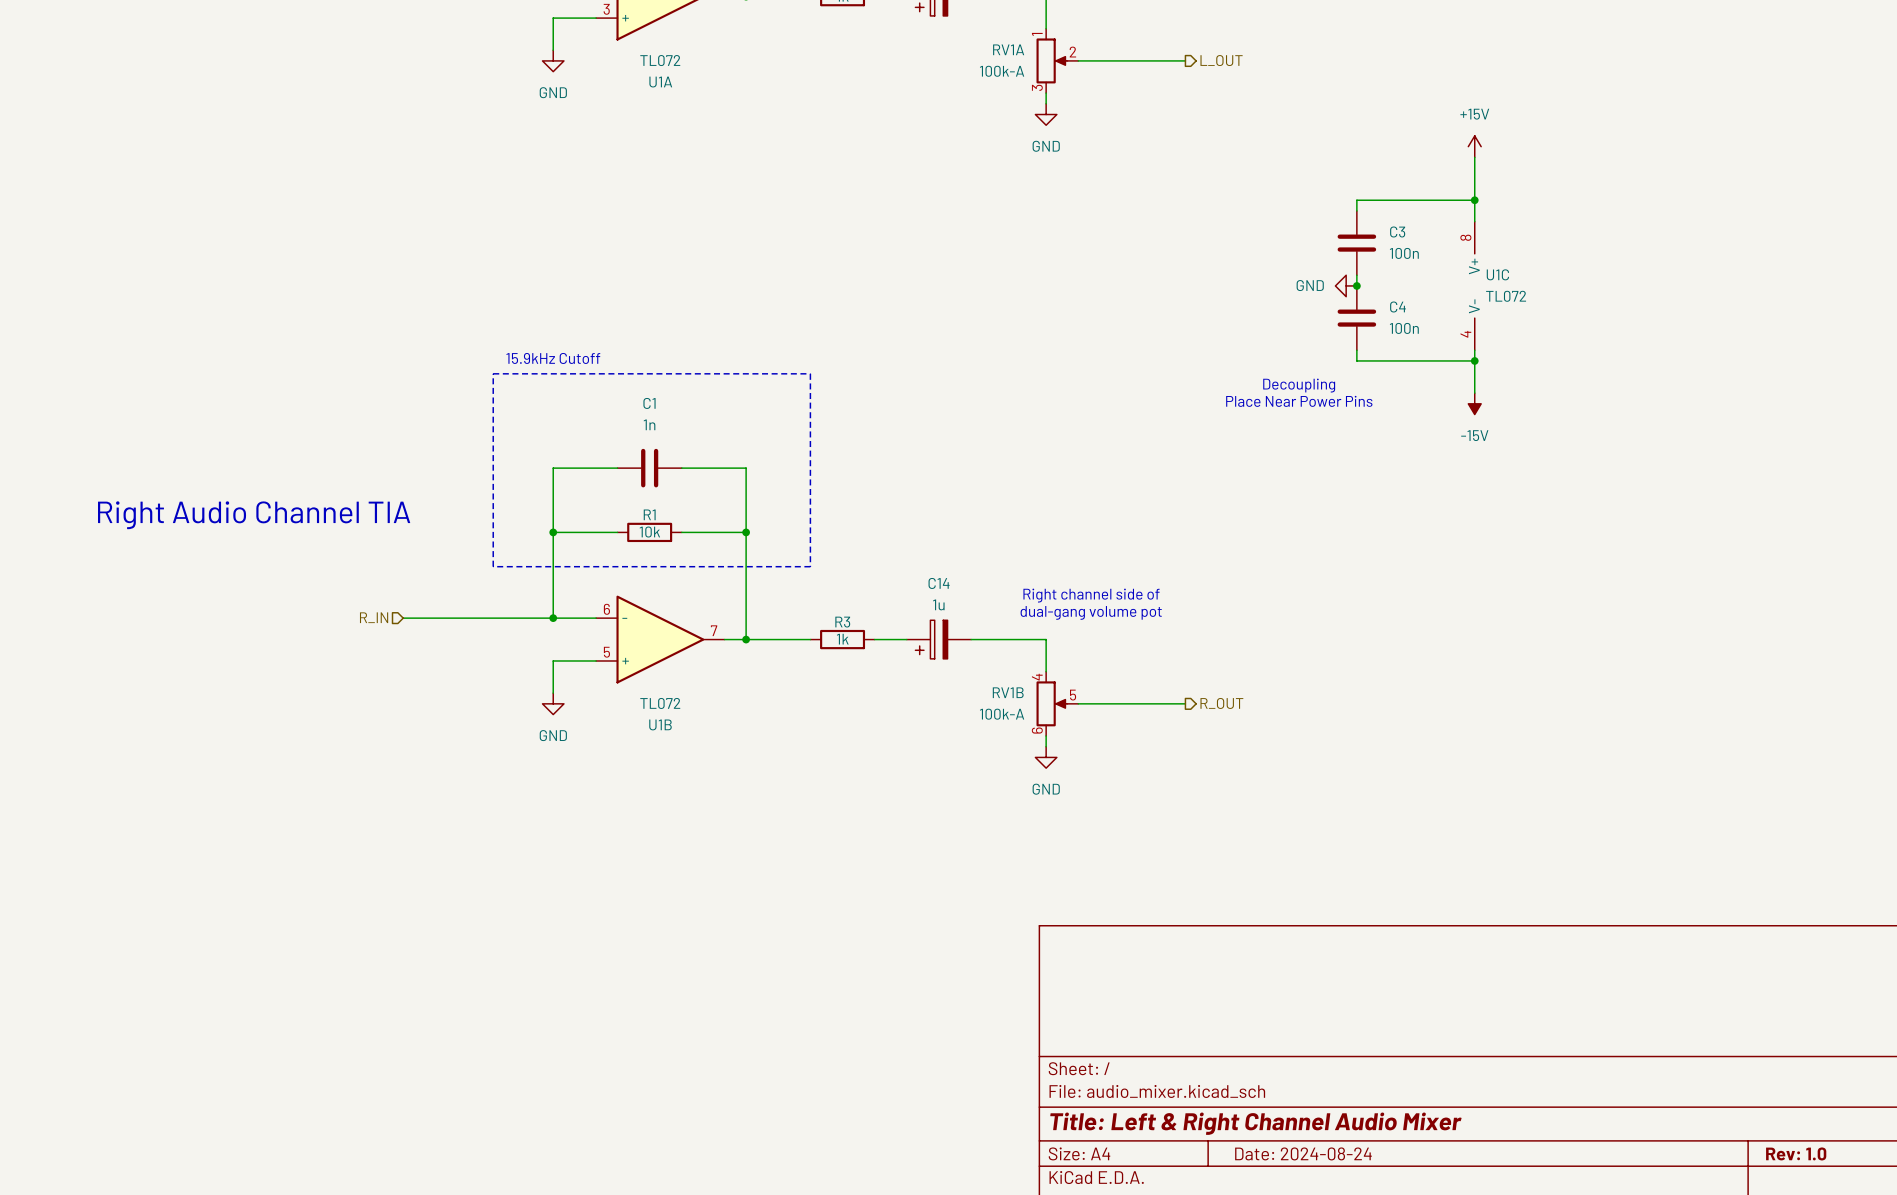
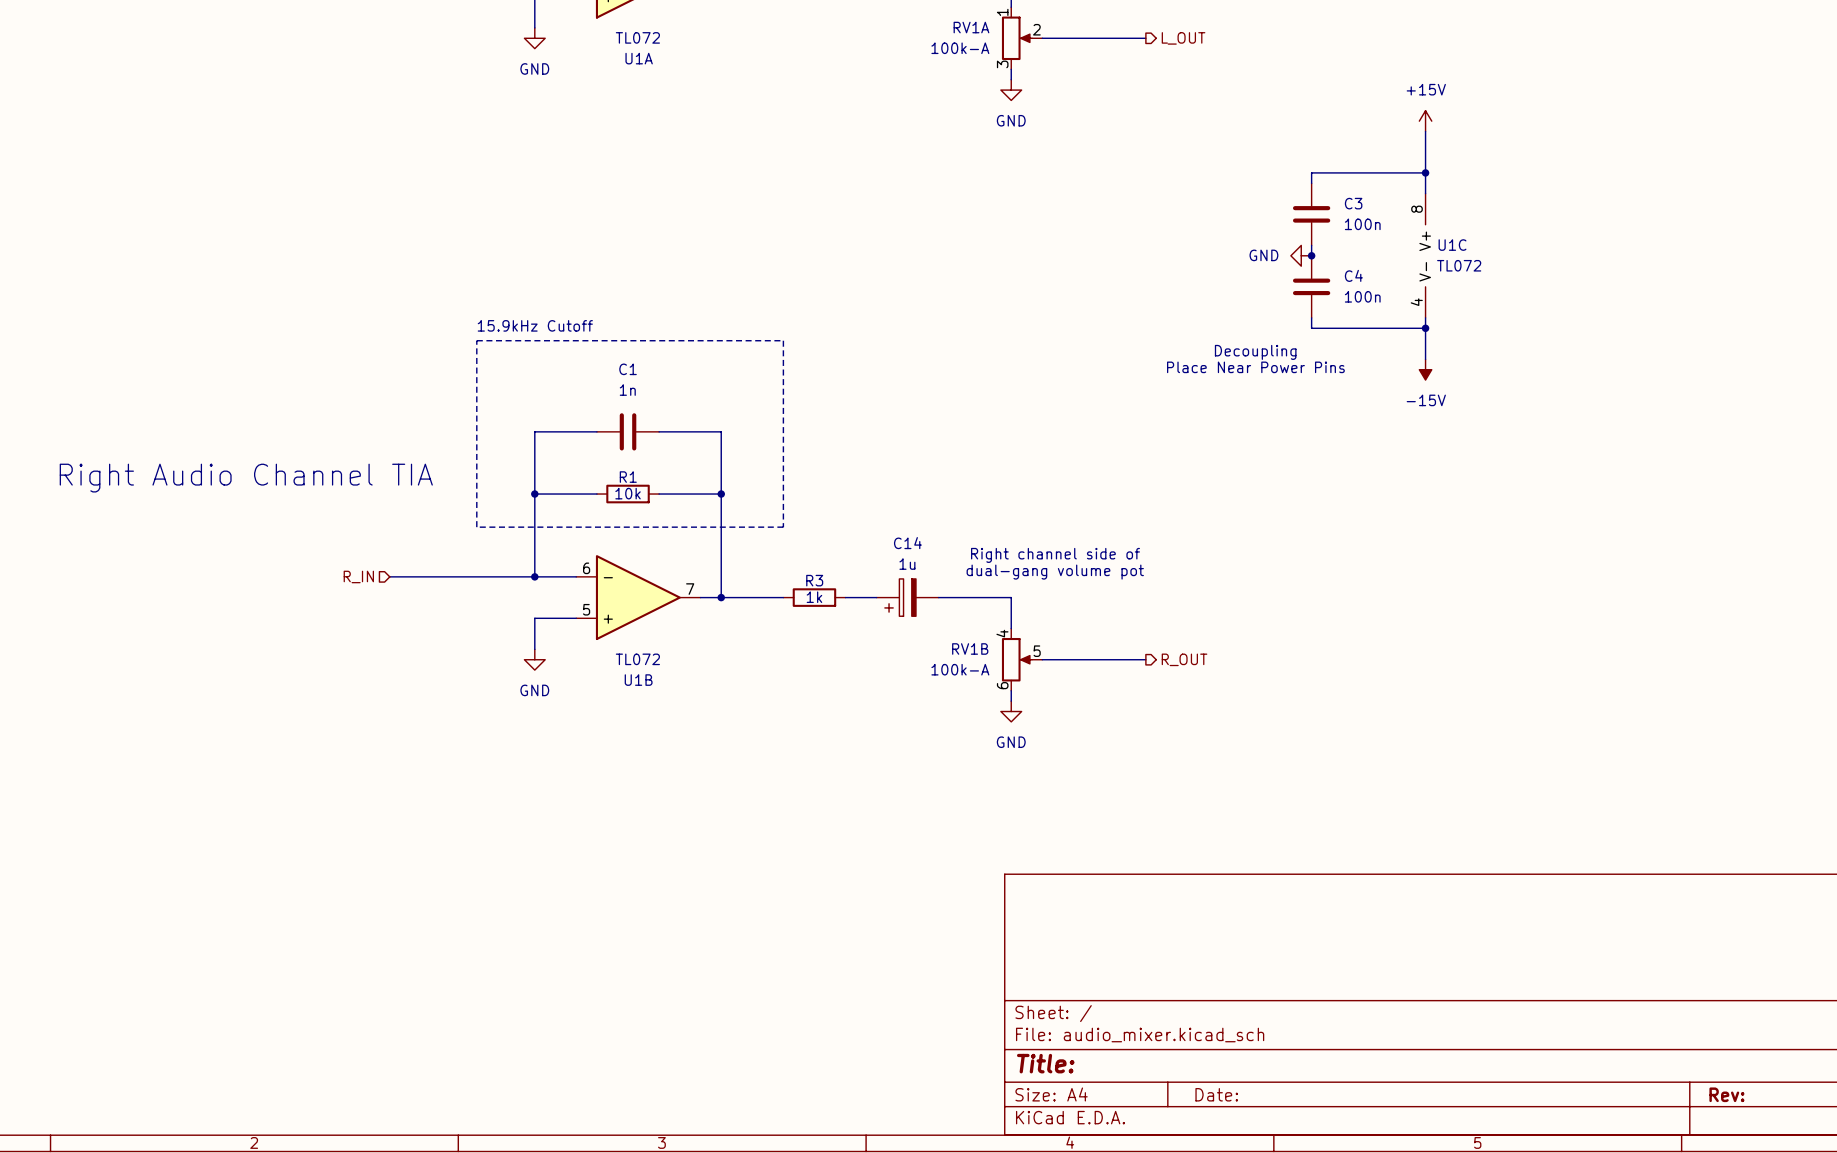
title block: Title: Left & Right Channel Audio Mixer (1255, 1123) -> Title: (1045, 1063)
title block: Date: 2024-08-24 (1303, 1153) -> Date: (1216, 1094)
title block: Rev: 1.0 (1796, 1153) -> Rev: (1726, 1094)

